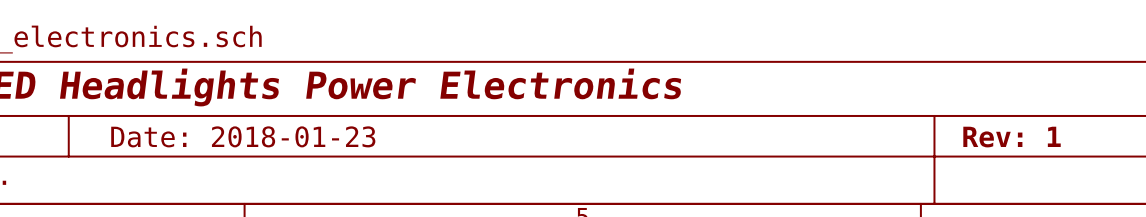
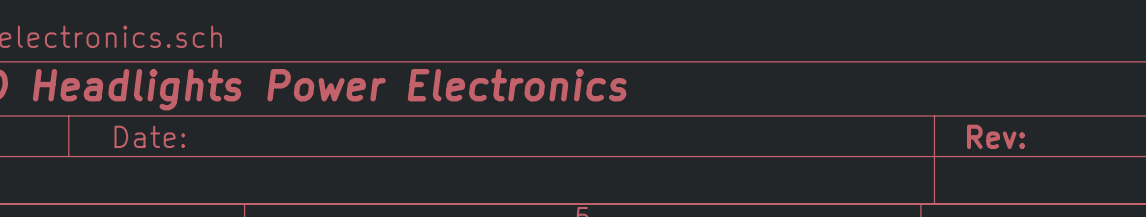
title block: Date: 2018-01-23 (243, 136) -> Date: (149, 136)
title block: Rev: 1 (1012, 137) -> Rev: (996, 136)

